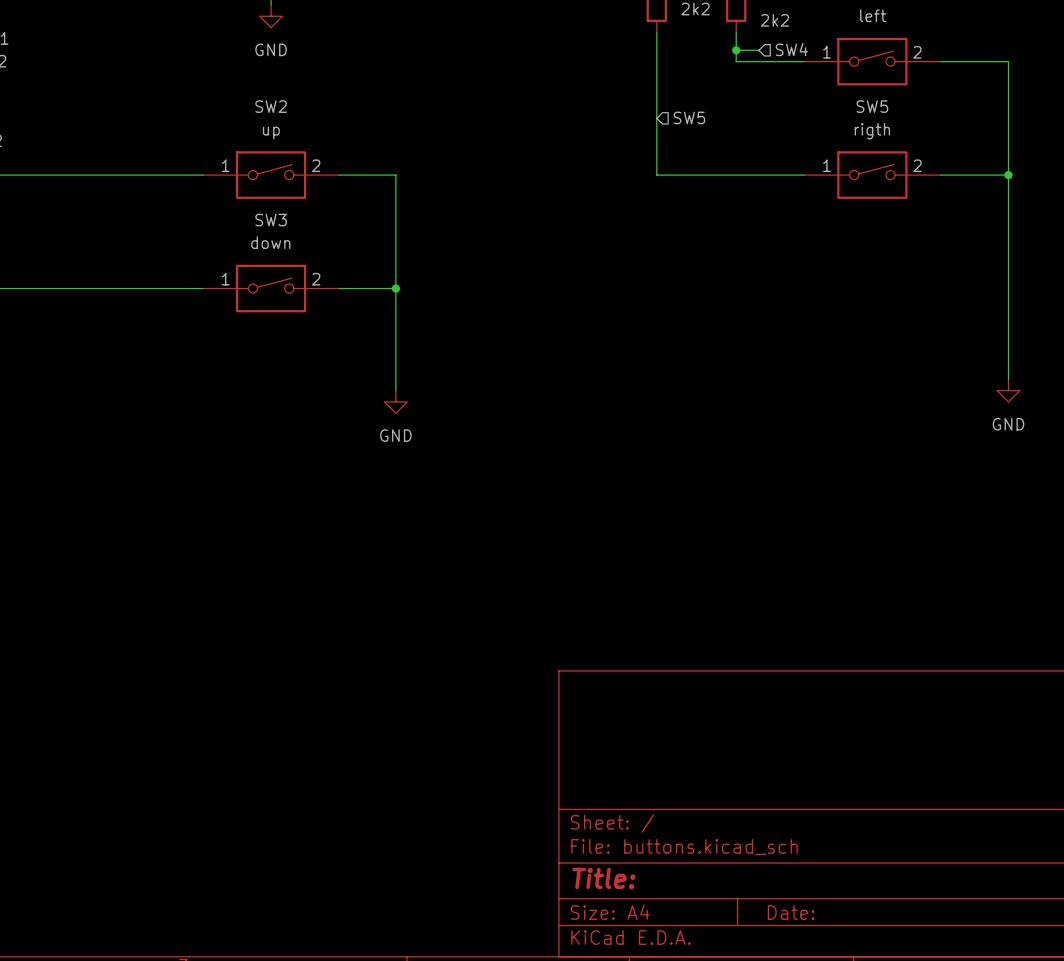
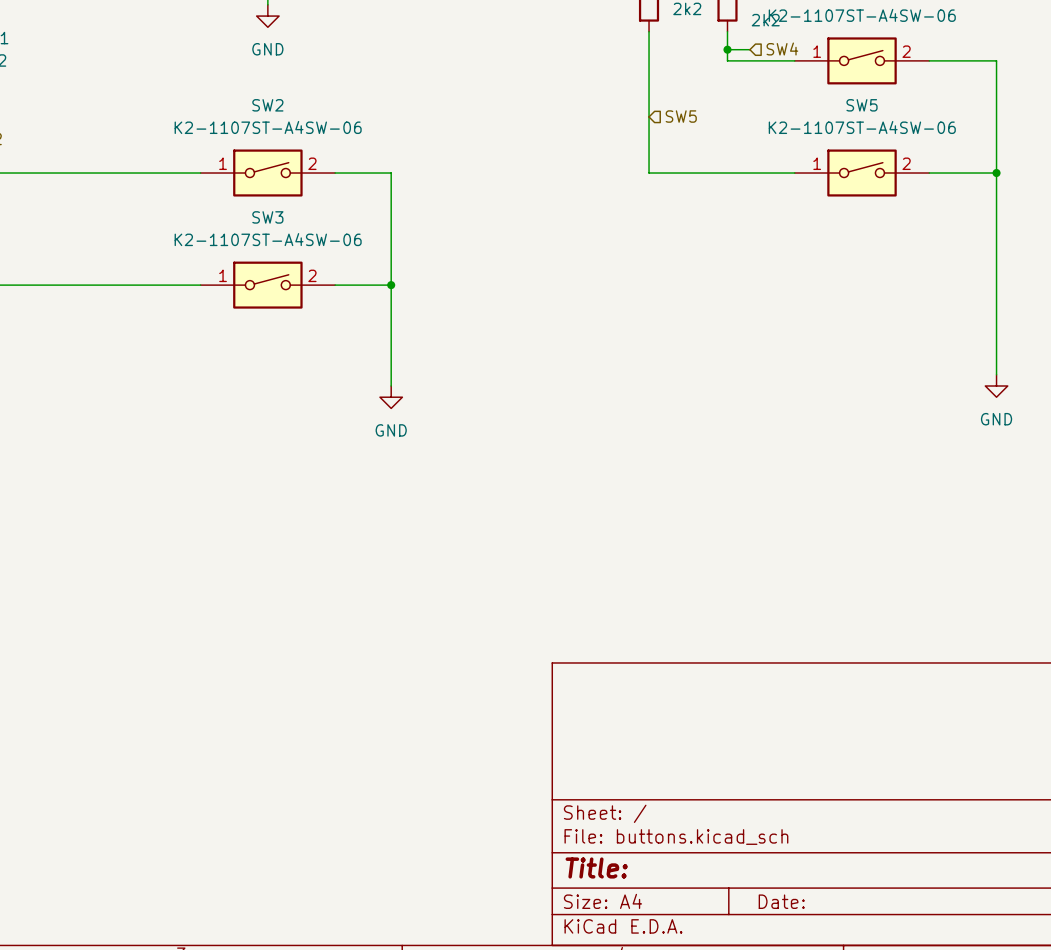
part value: left (873, 15) -> K2-1107ST-A4SW-06 (862, 15)
SW5 value: rigth (872, 131) -> K2-1107ST-A4SW-06 (862, 127)
SW2 value: up (271, 133) -> K2-1107ST-A4SW-06 (268, 127)
SW3 value: down (270, 242) -> K2-1107ST-A4SW-06 (268, 239)

